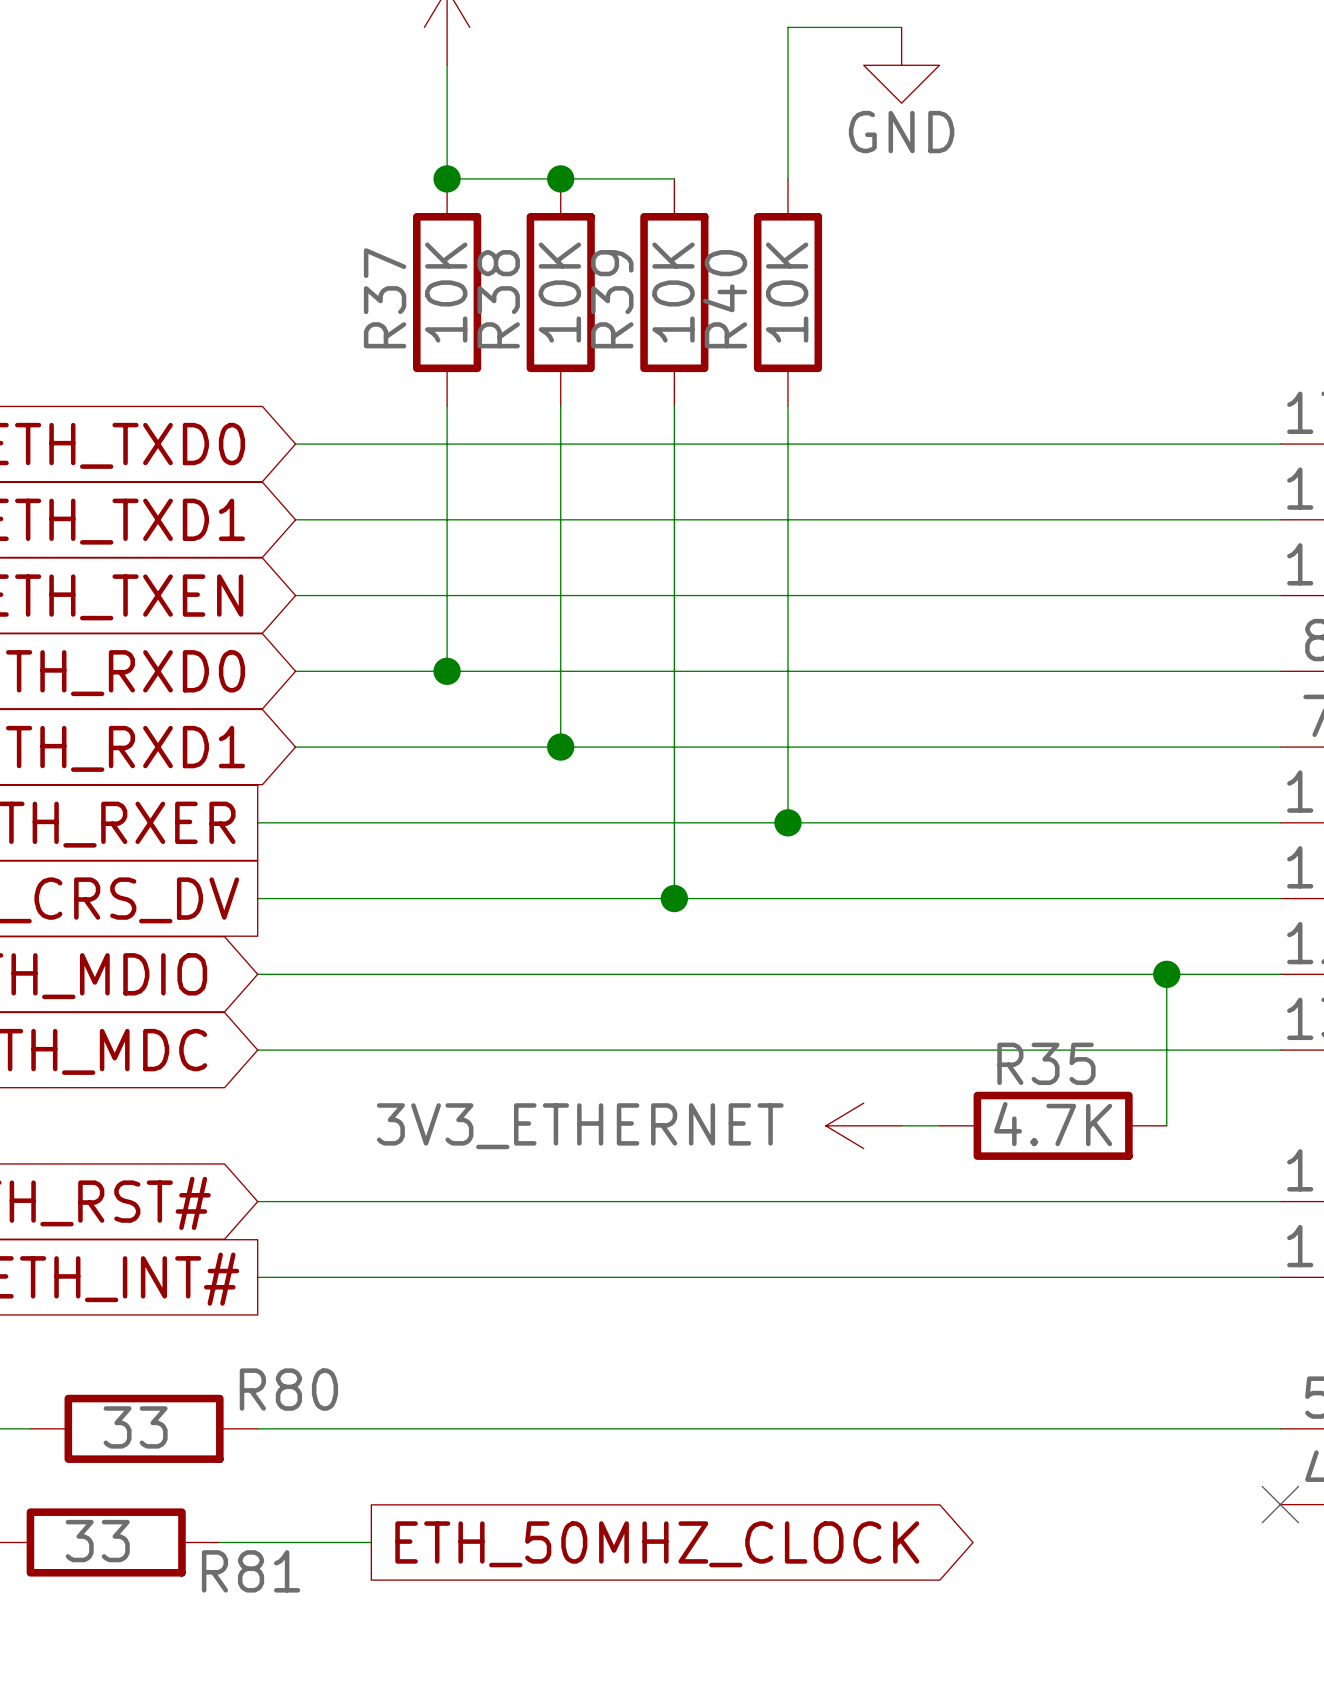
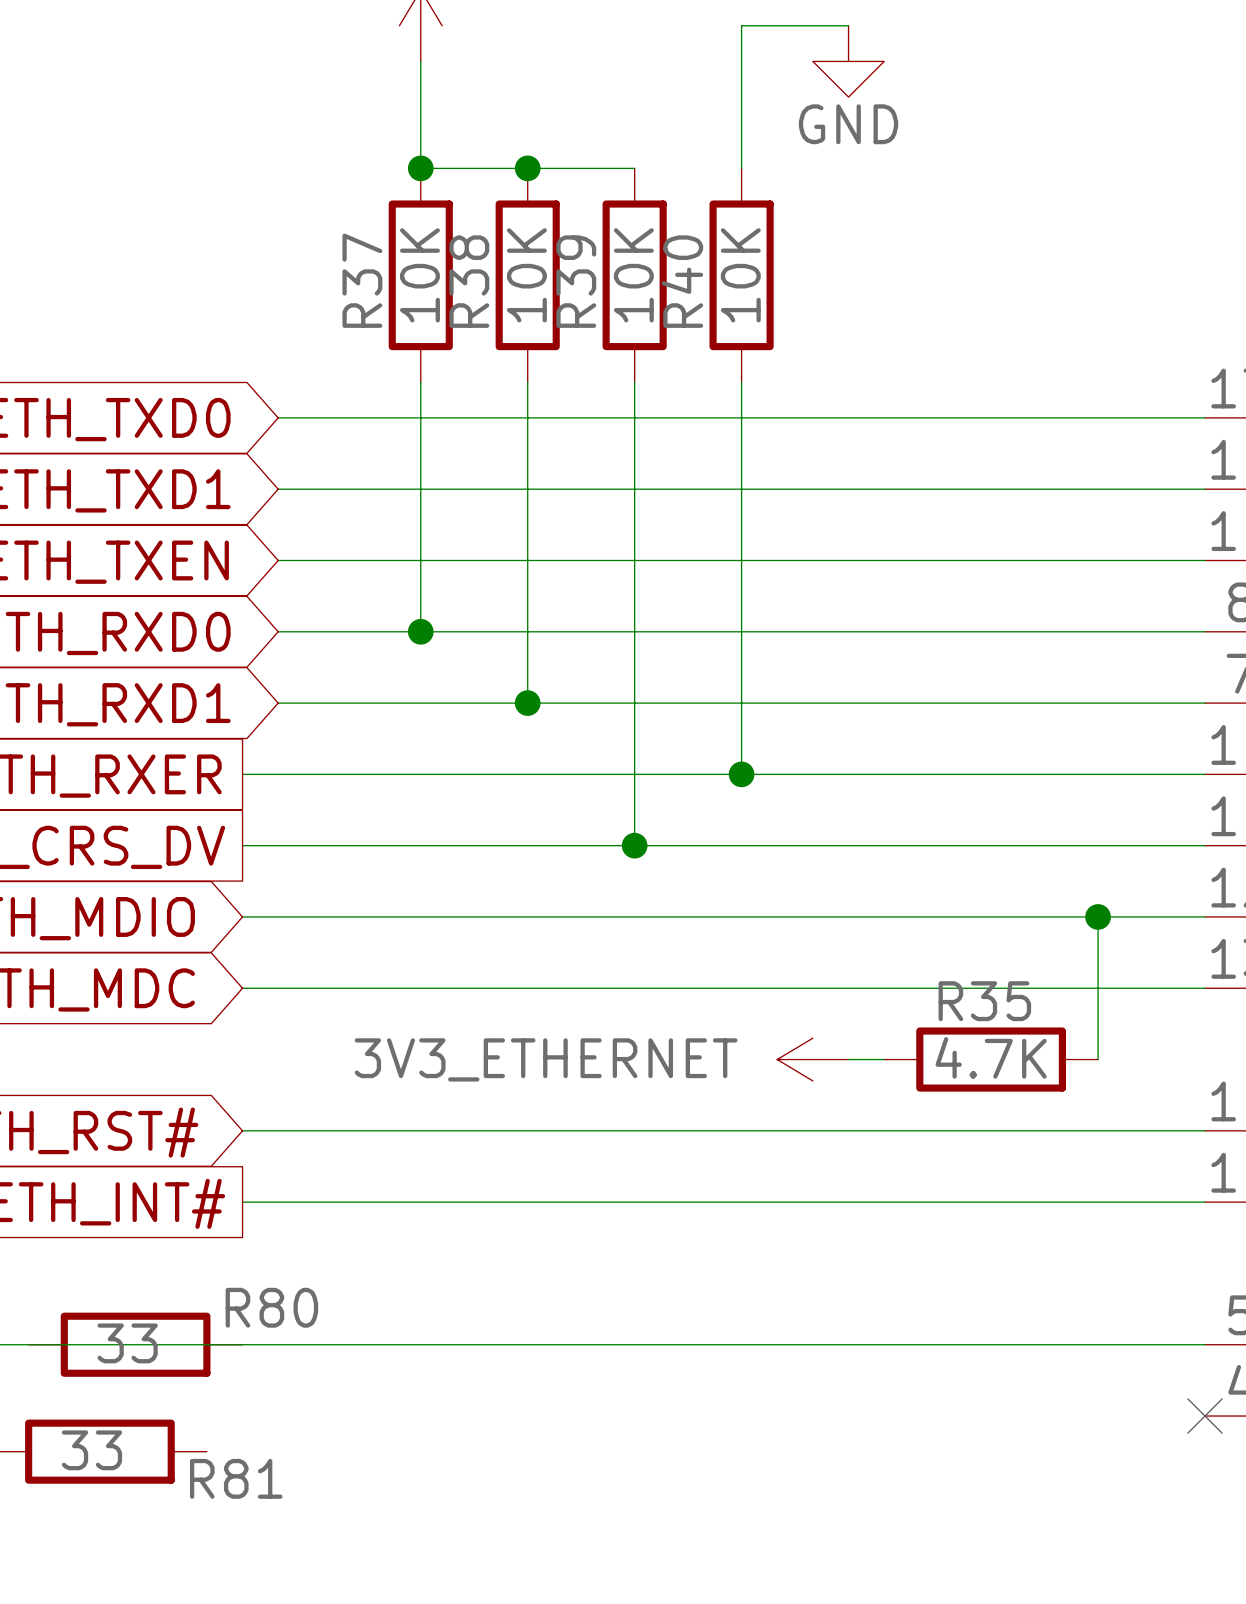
wire: none -> (28, 1344) (242, 1344)
wire: (219, 1542) (371, 1542) -> none
global label: ETH_50MHZ_CLOCK (657, 1544) -> none

